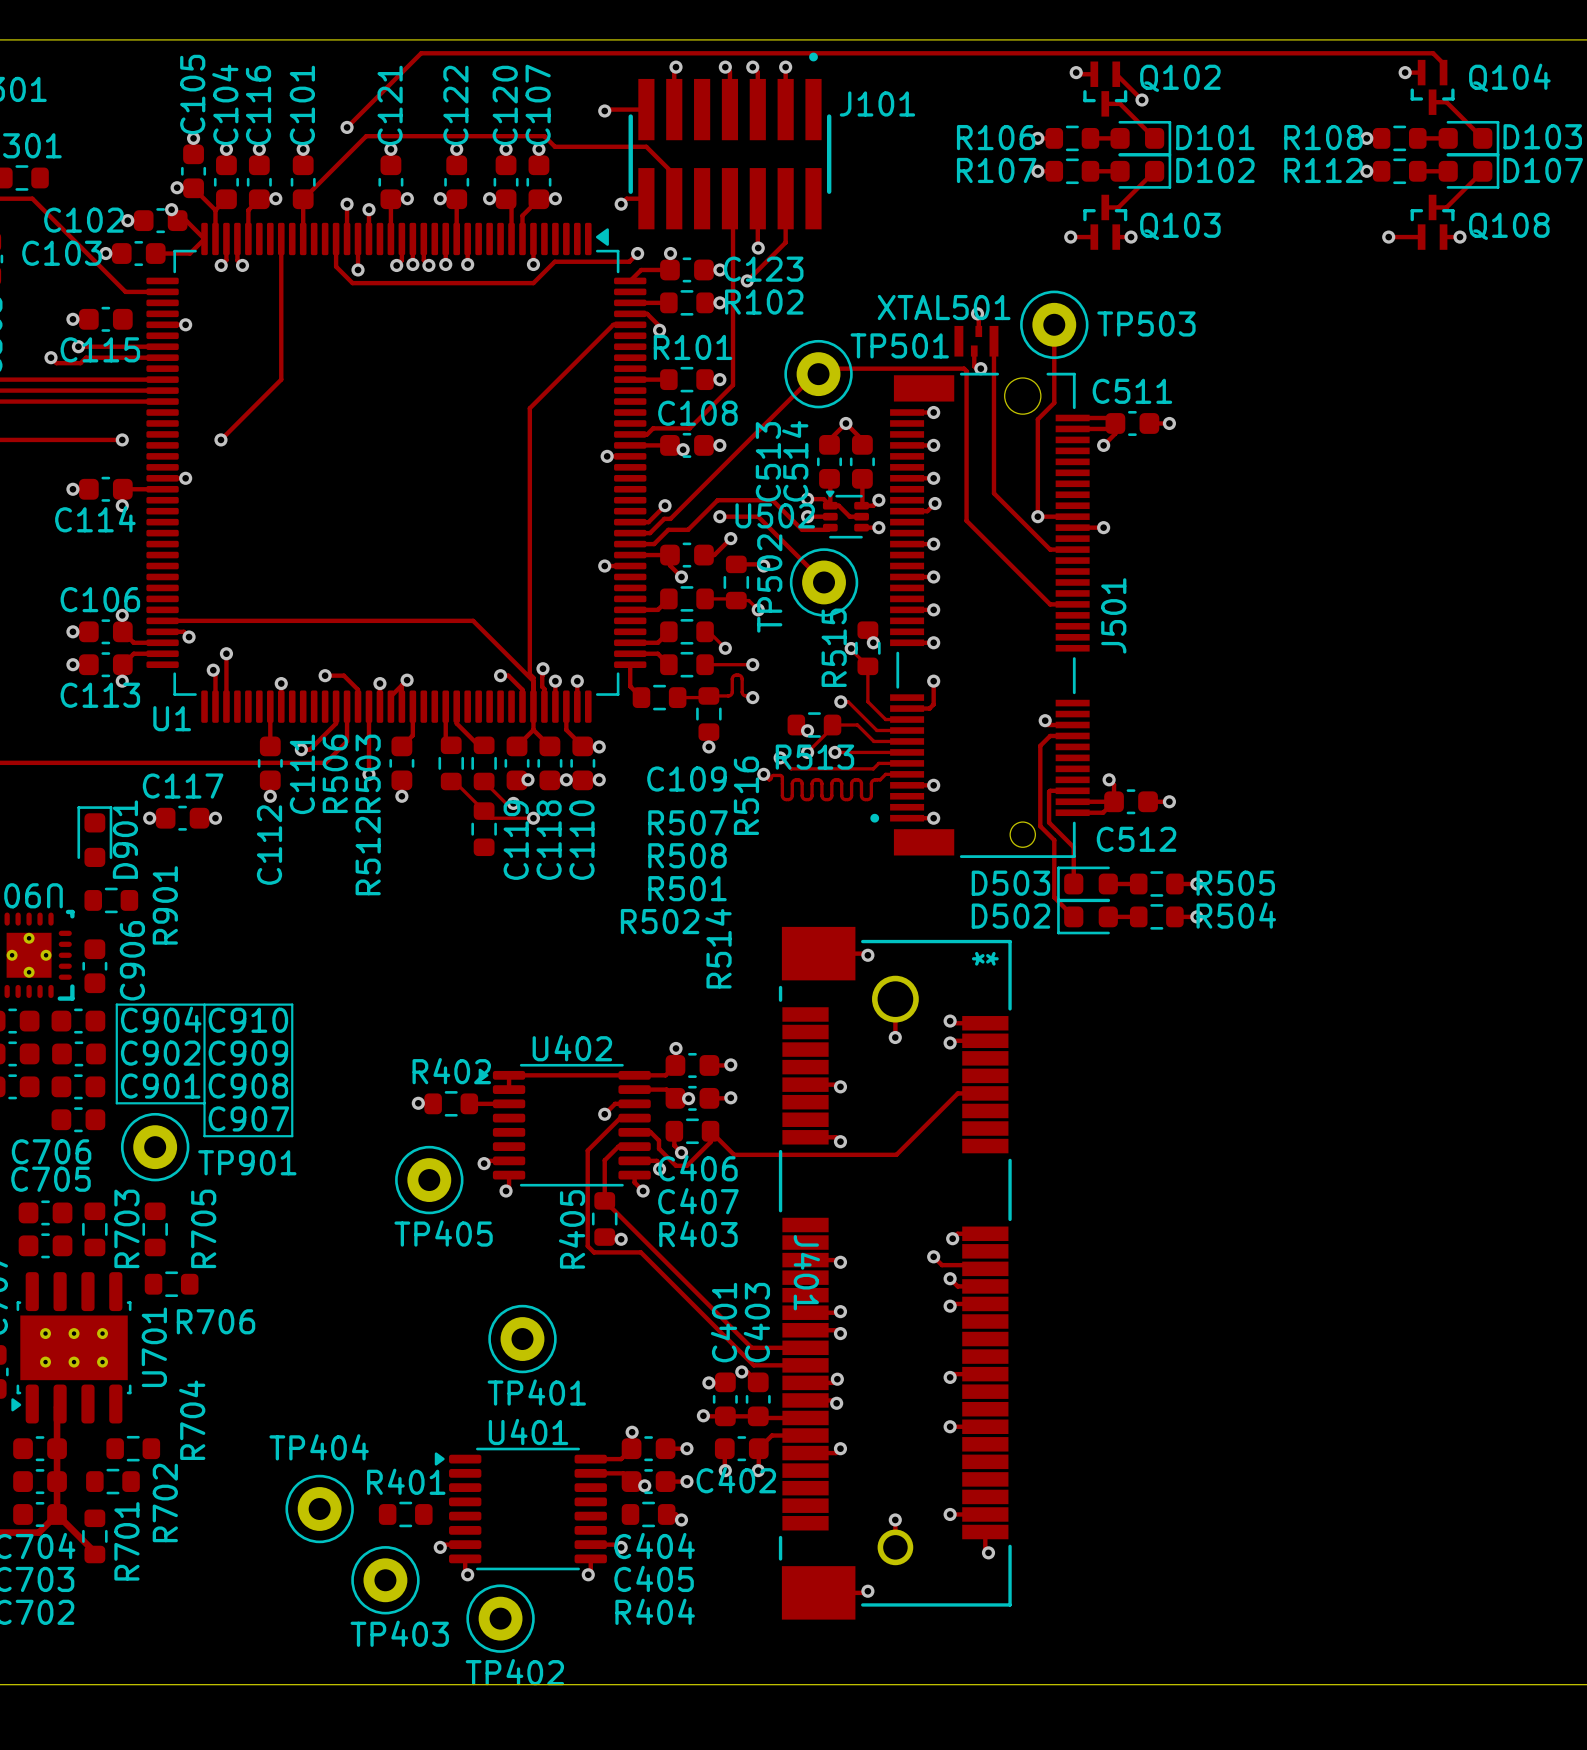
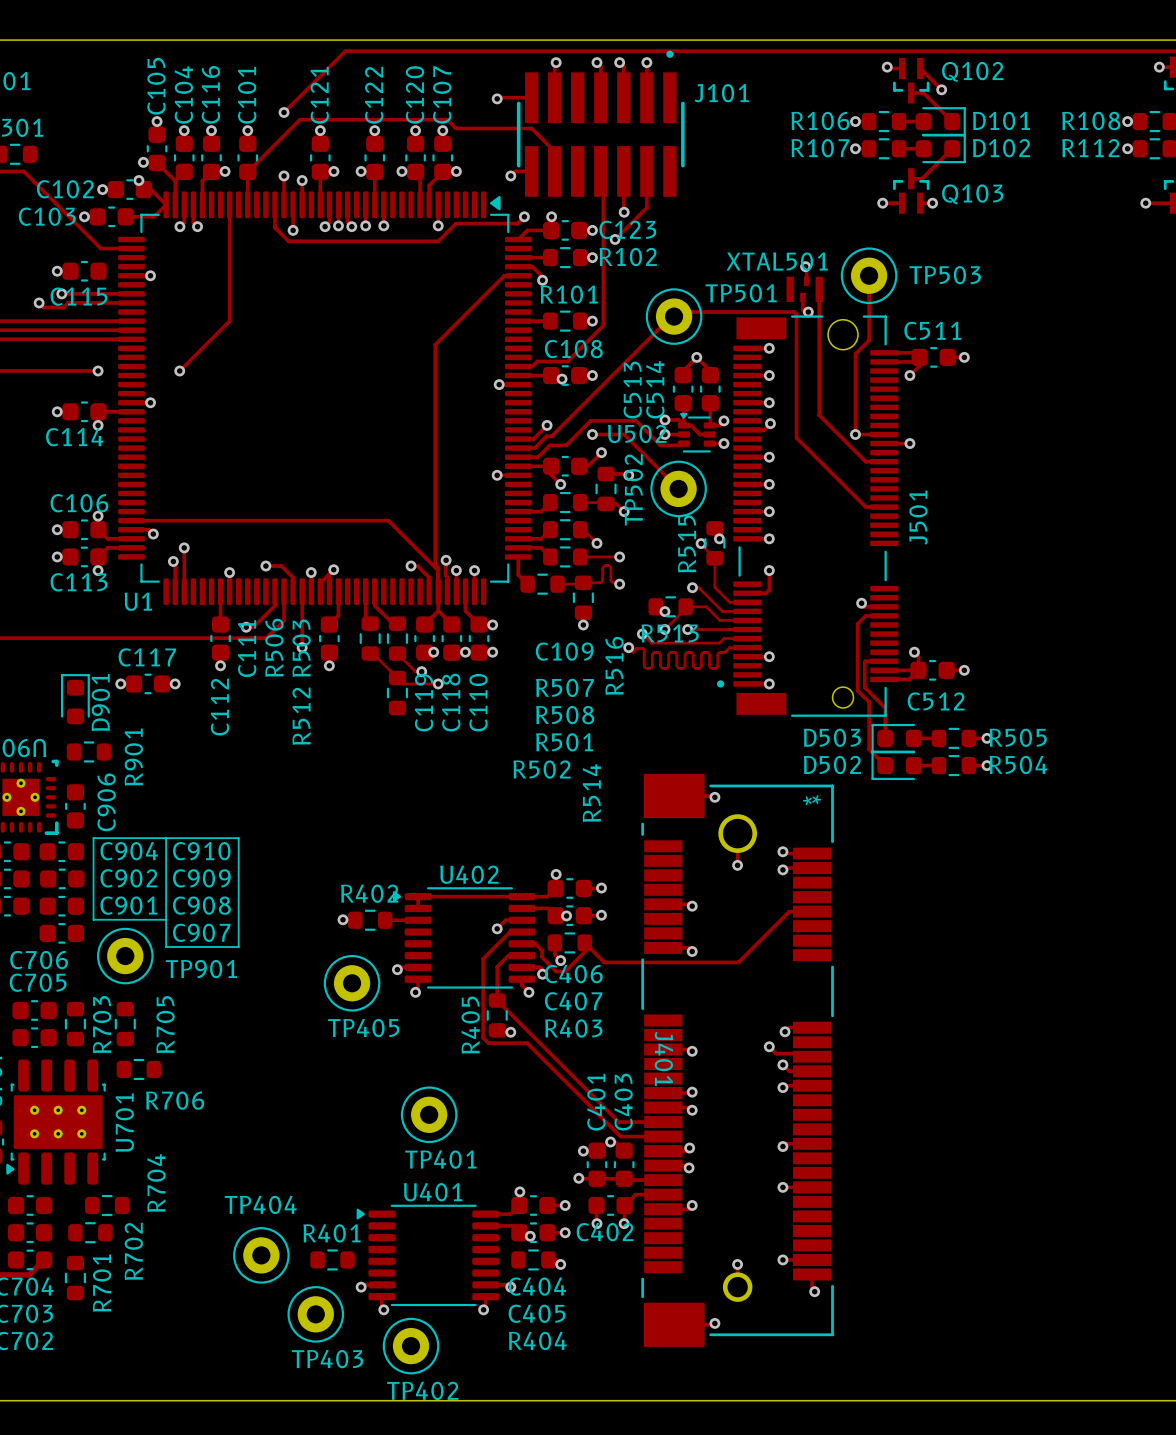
track: (60, 1404) (57, 1407) (57, 1514) (94, 1552) (94, 1554) -> none

